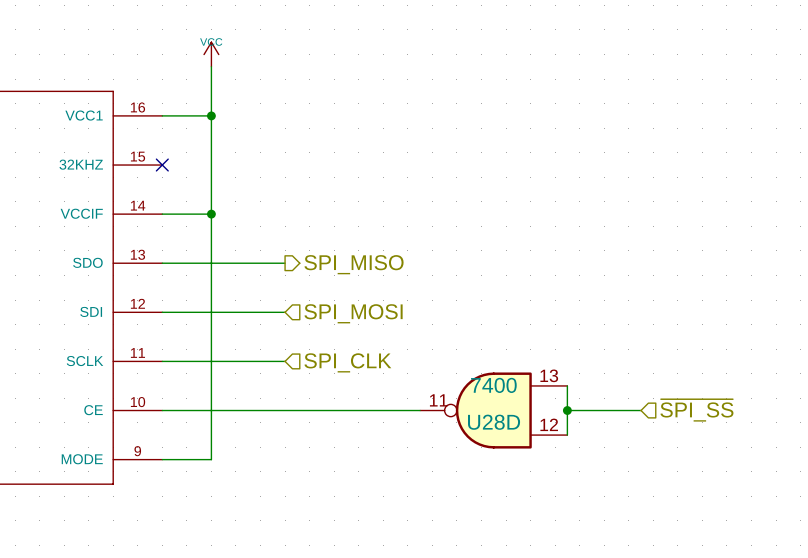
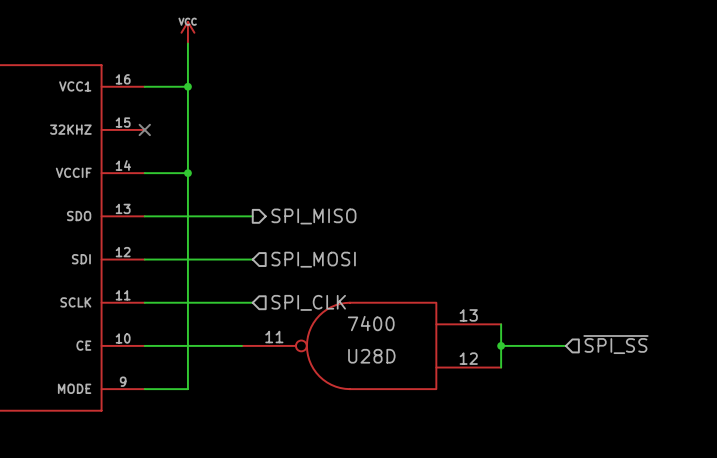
U28D symbol: [420, 372, 568, 449] -> [241, 302, 502, 390]
wire: (272, 410) (420, 410) -> none

